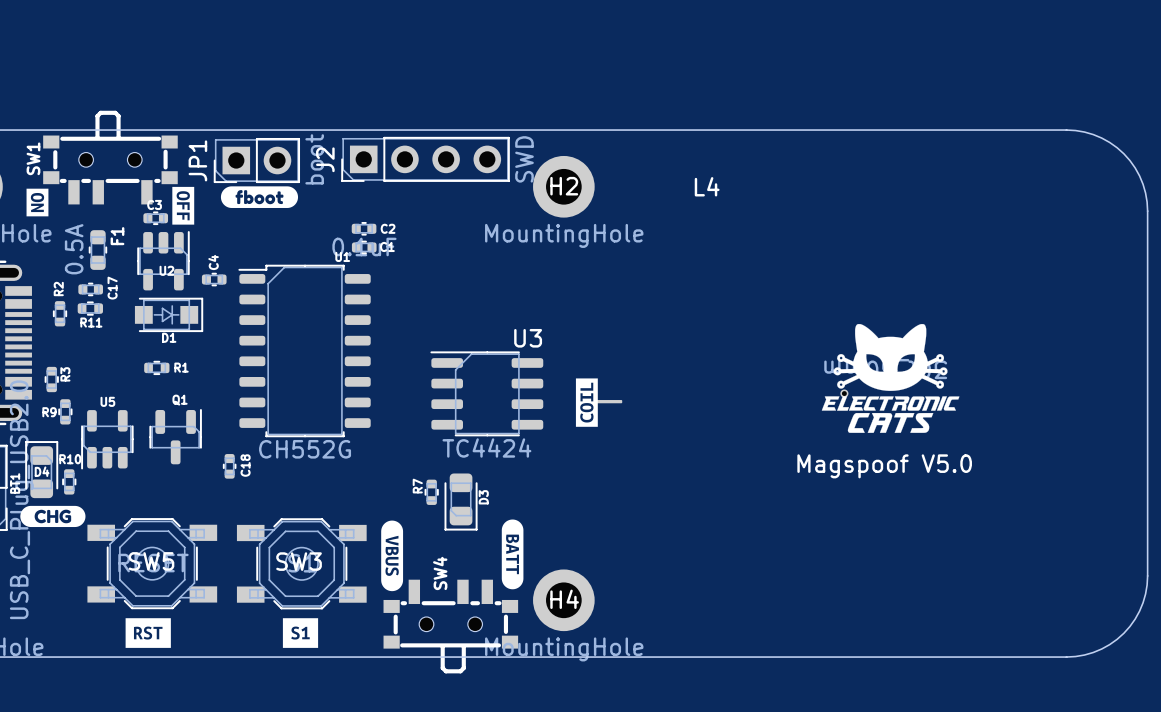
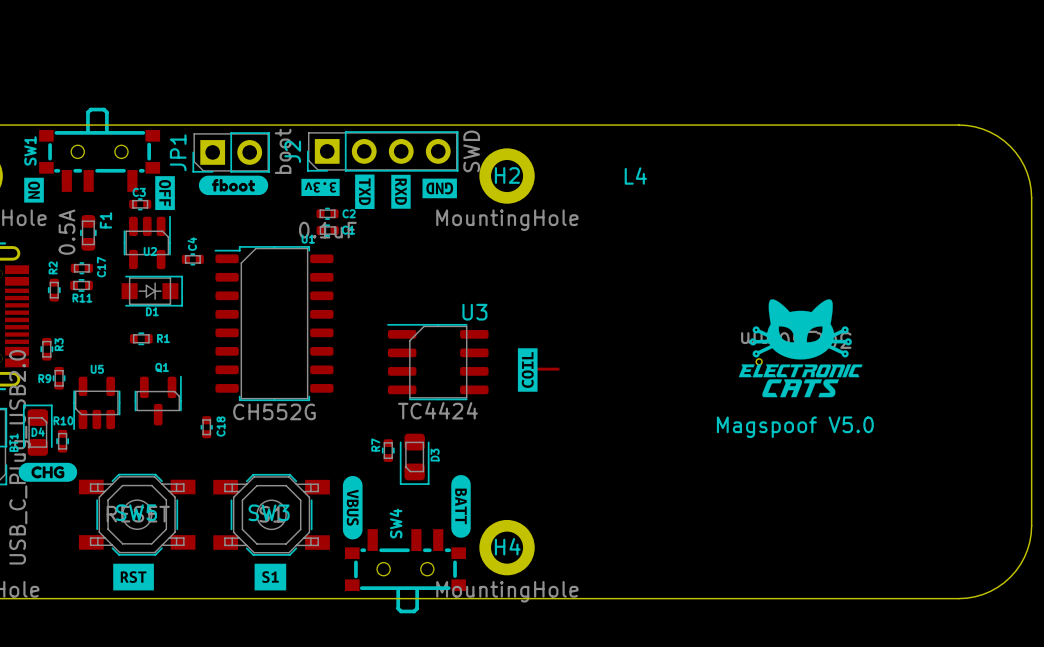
drawing: none -> [301, 174, 457, 210]

